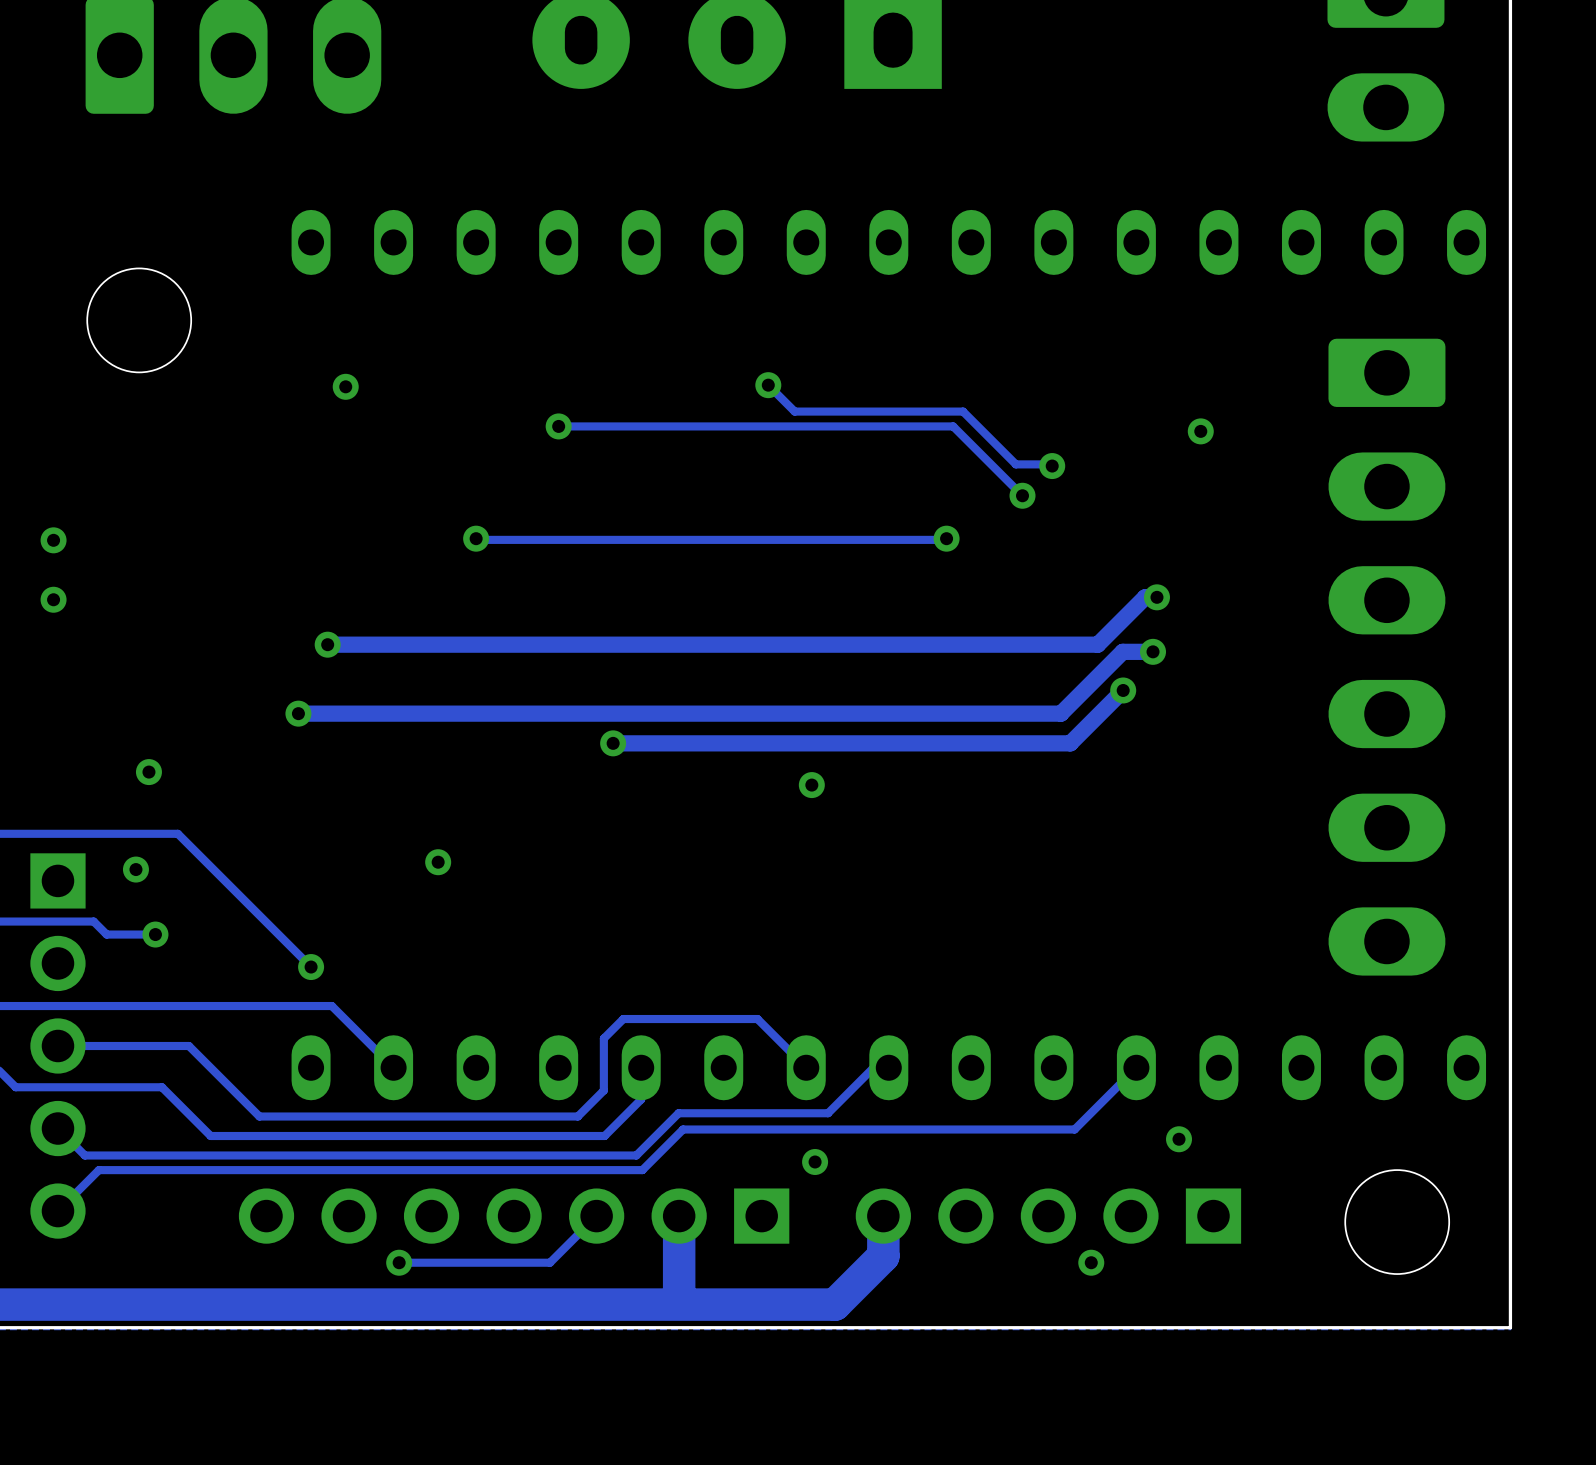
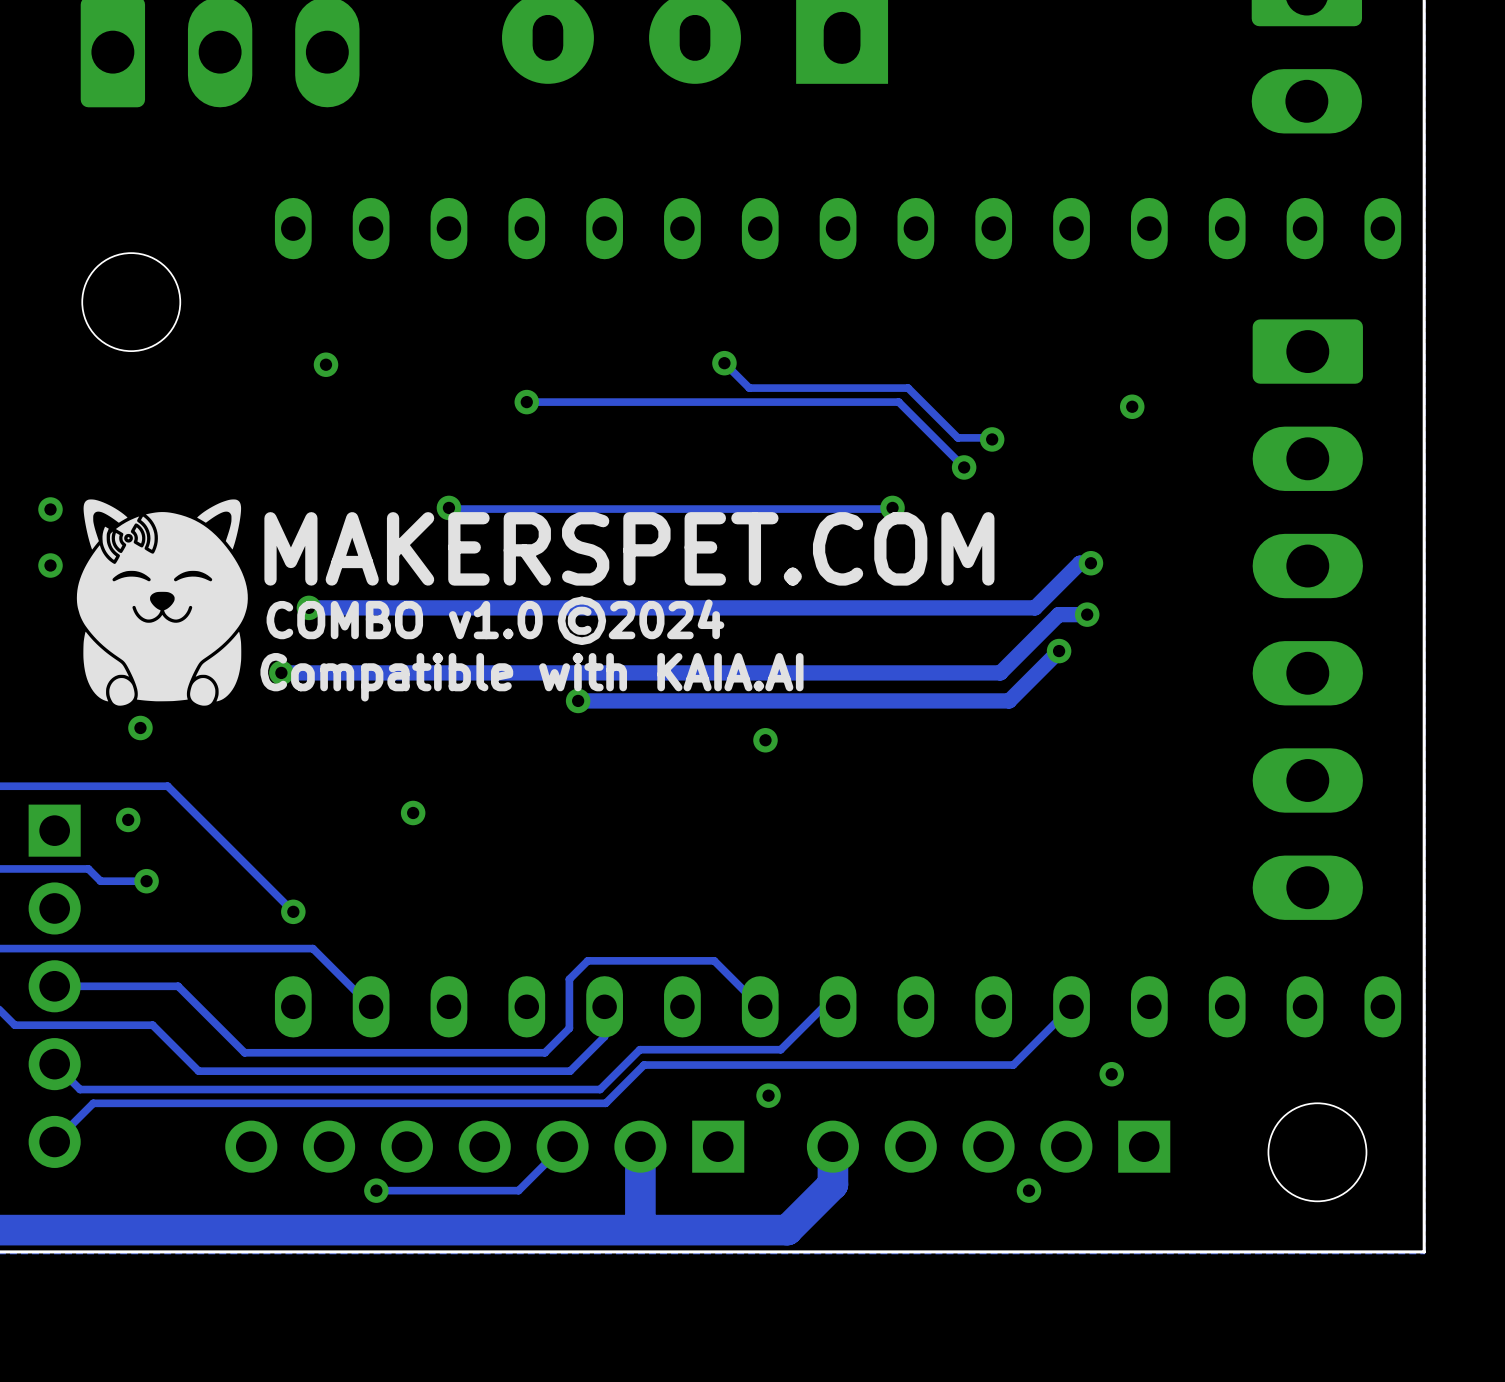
drawing: none -> [76, 499, 248, 706]
text: none -> MAKERSPET.COM (629, 548)
text: none -> COMBO v1.0 (404, 620)
text: none -> ©2024 (640, 620)
text: none -> Compatible with KAIA.AI (532, 677)

